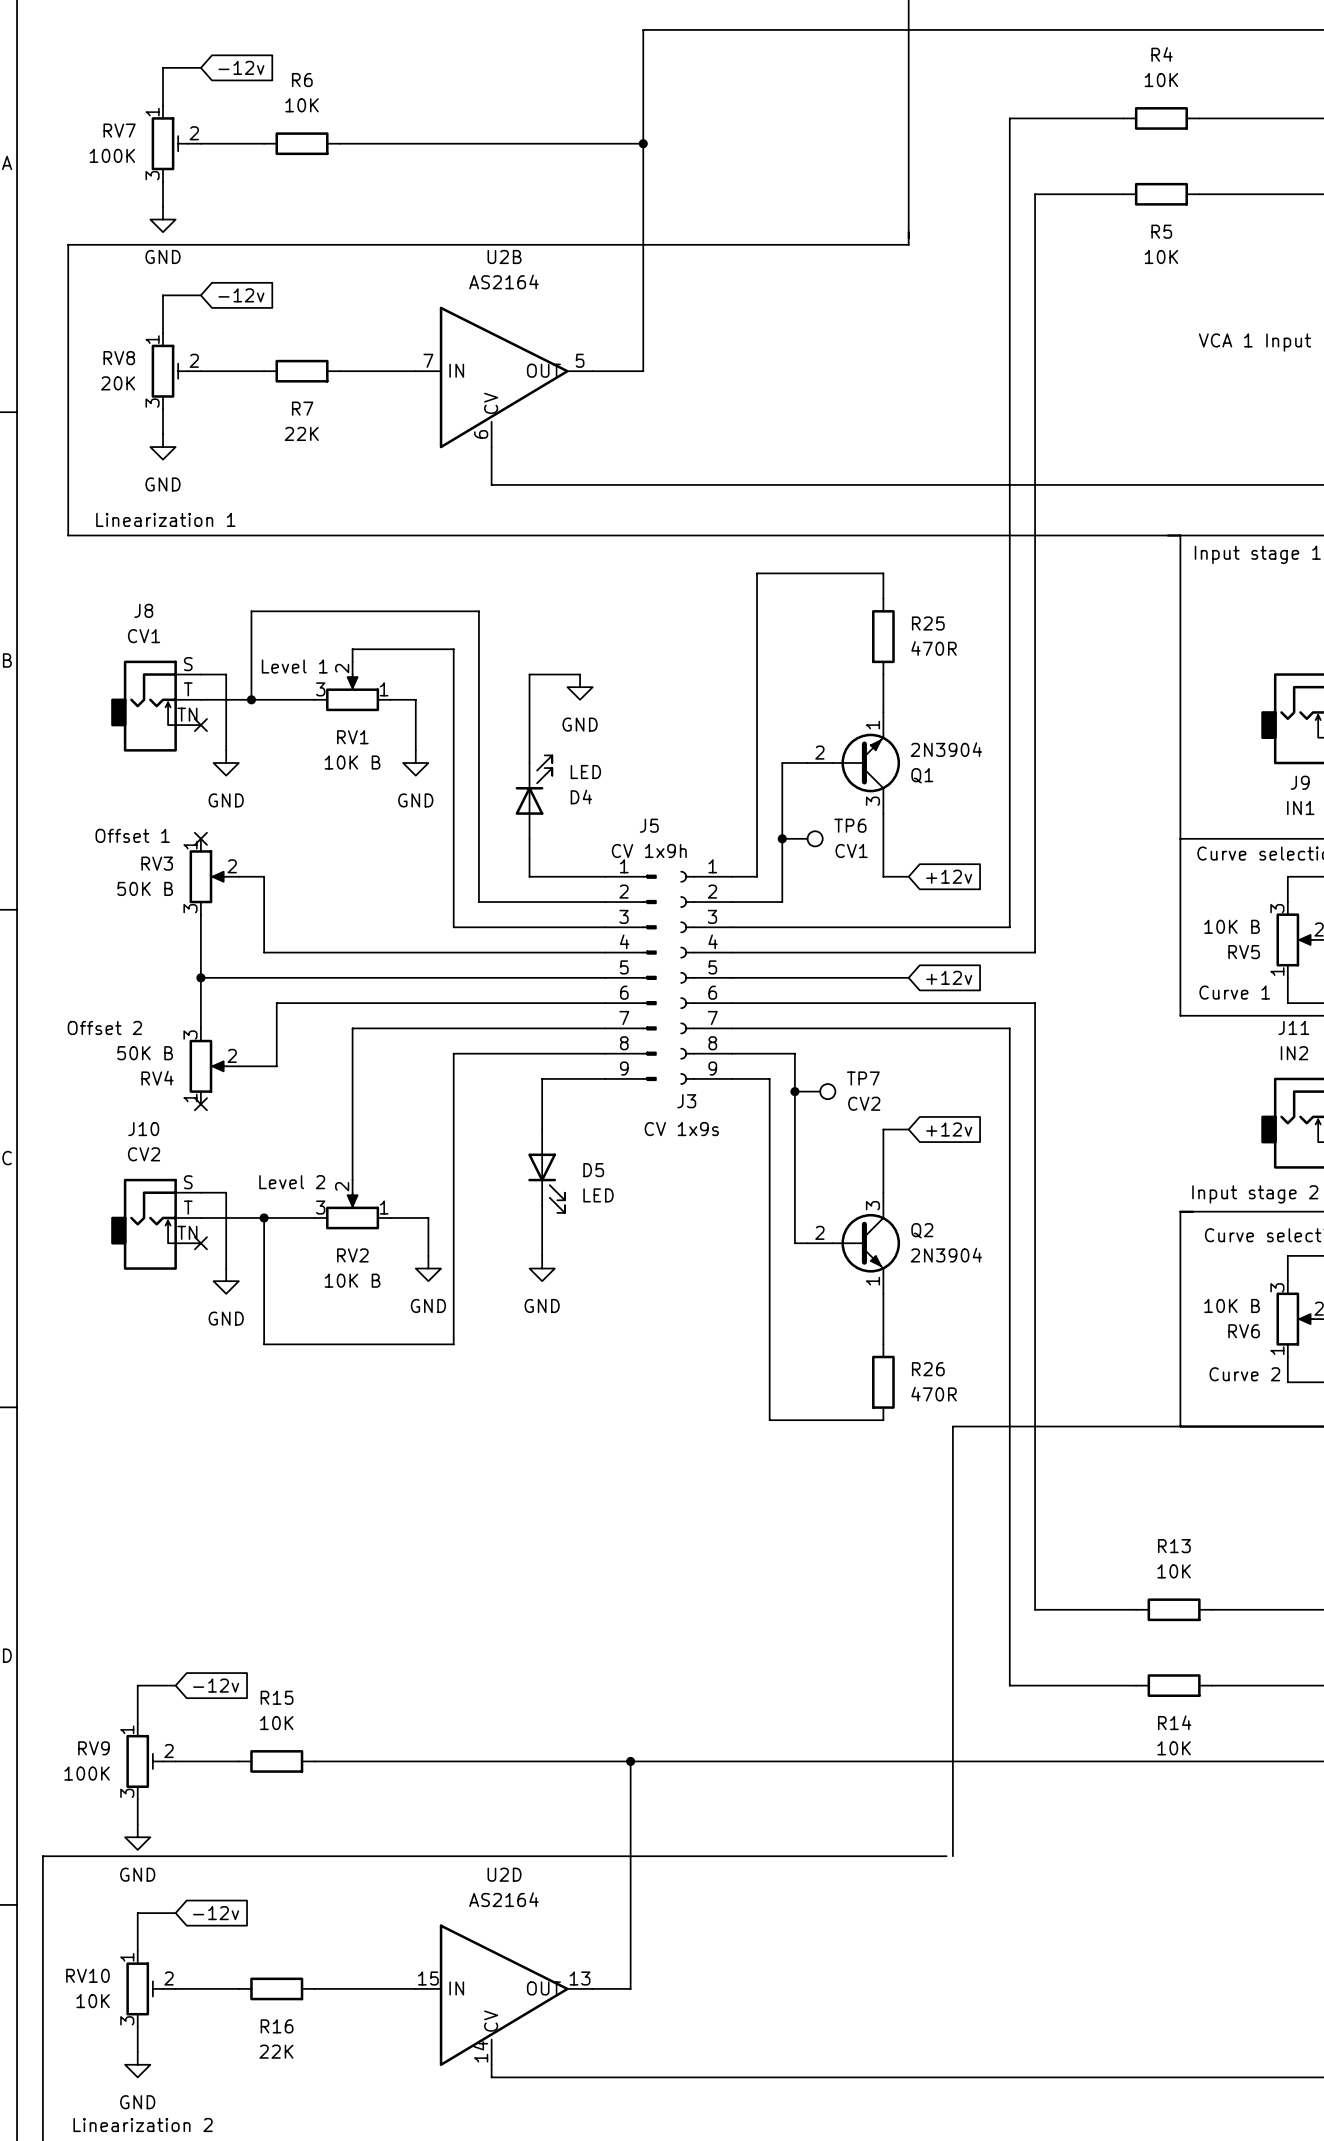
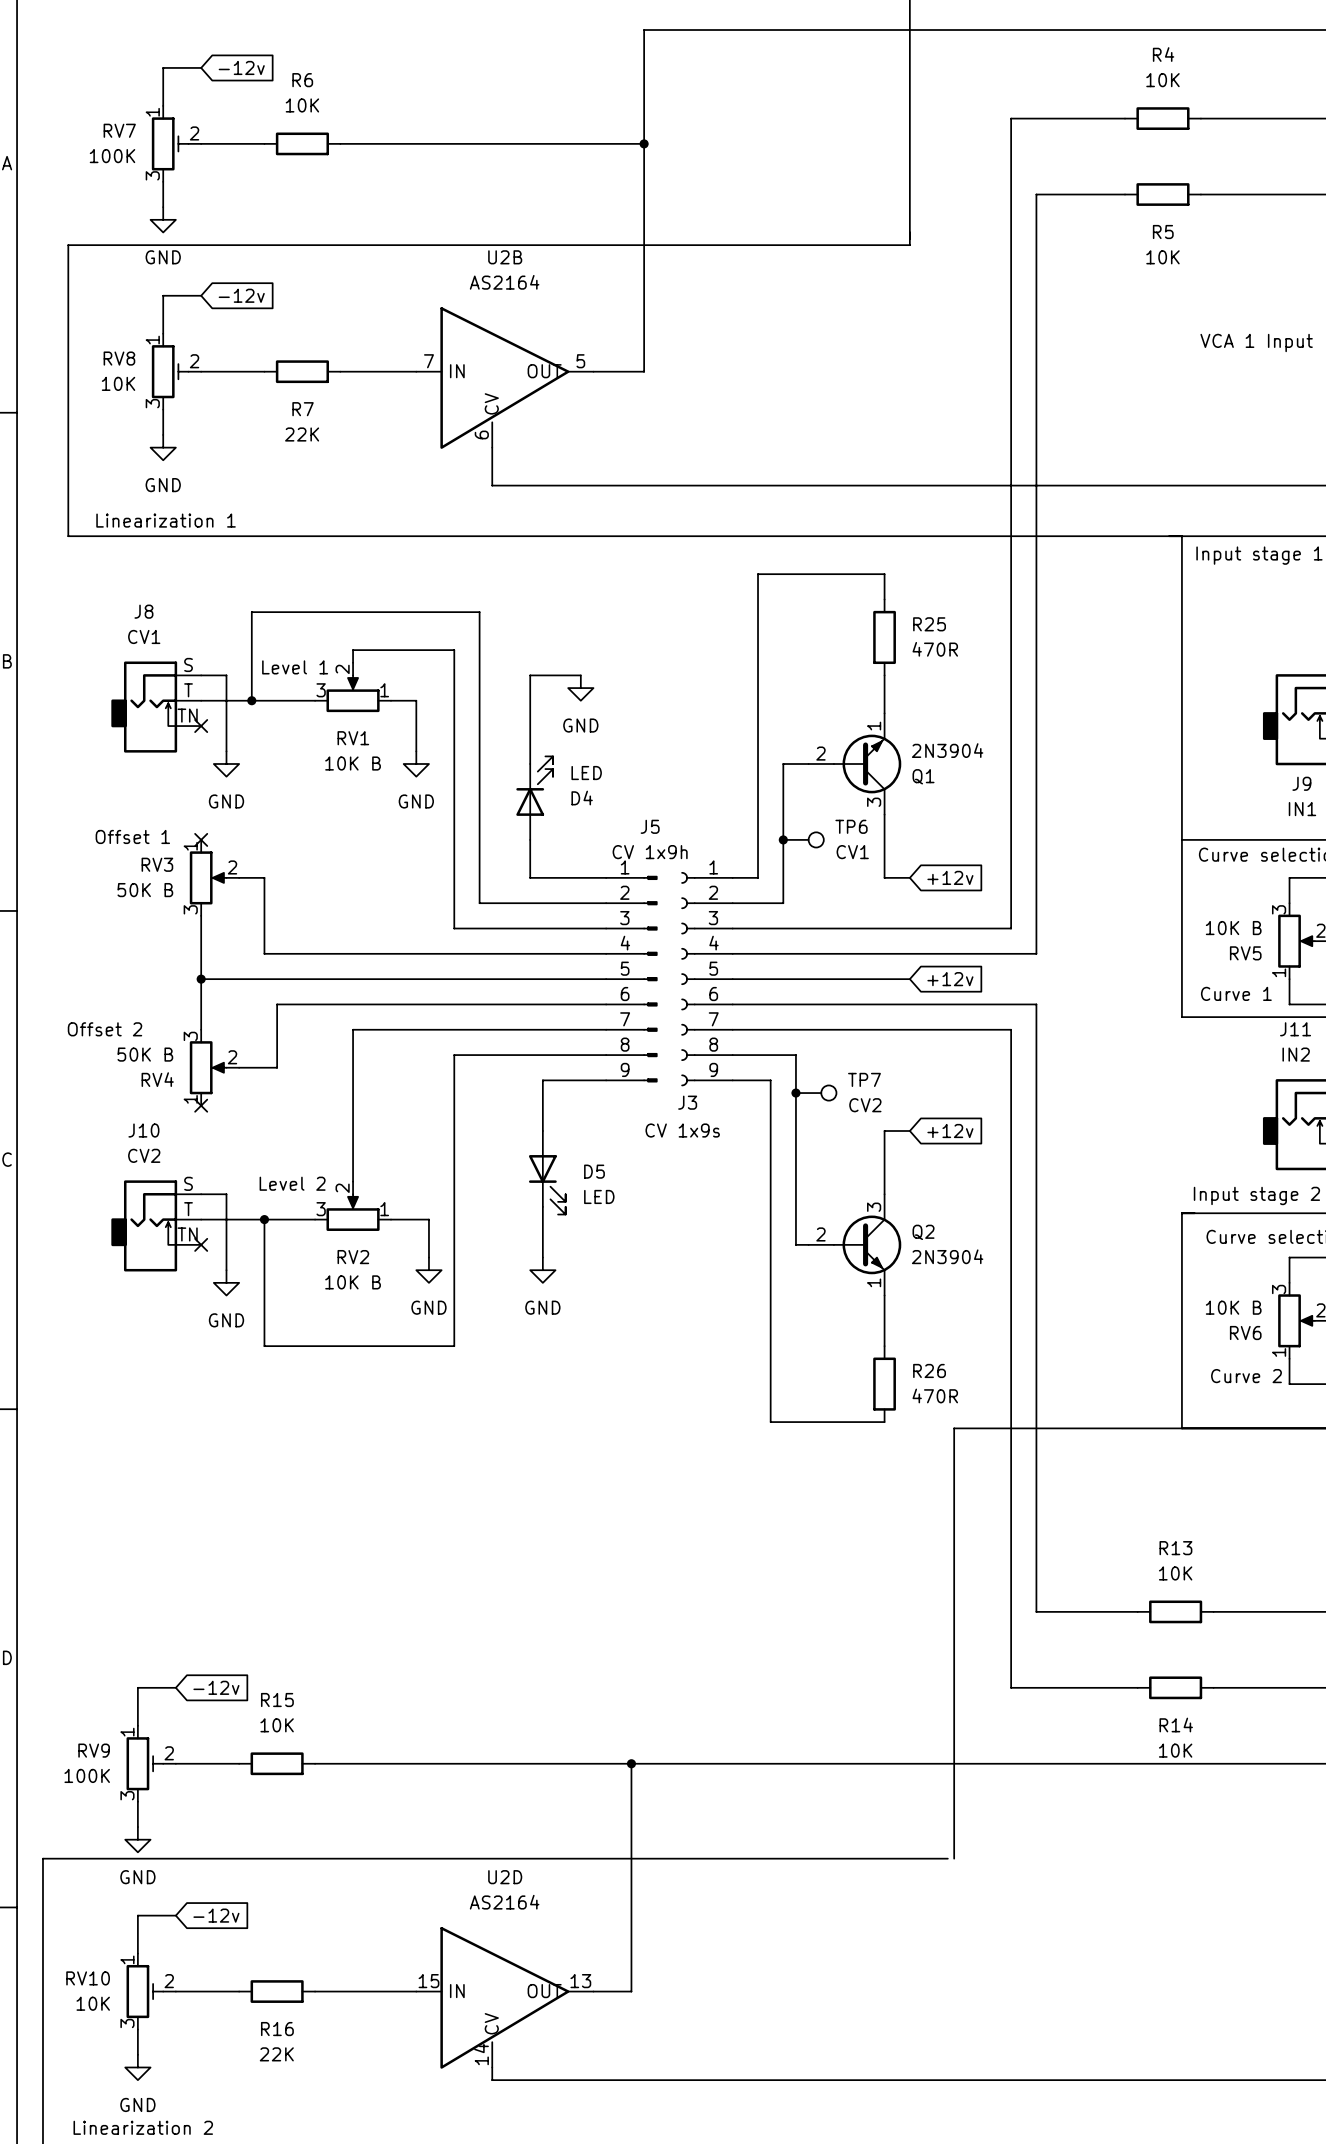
RV8 value: 20K (118, 383) -> 10K (118, 383)

